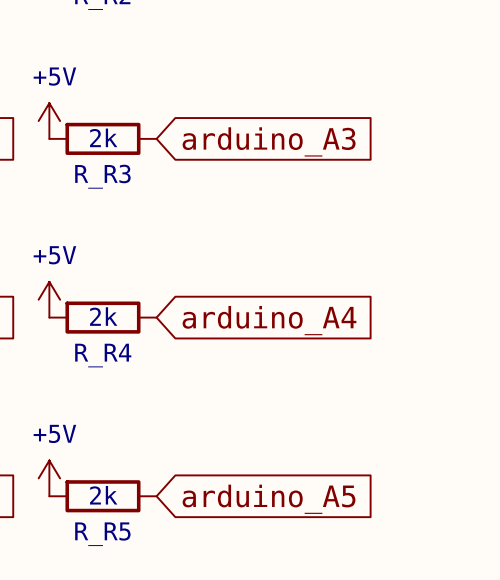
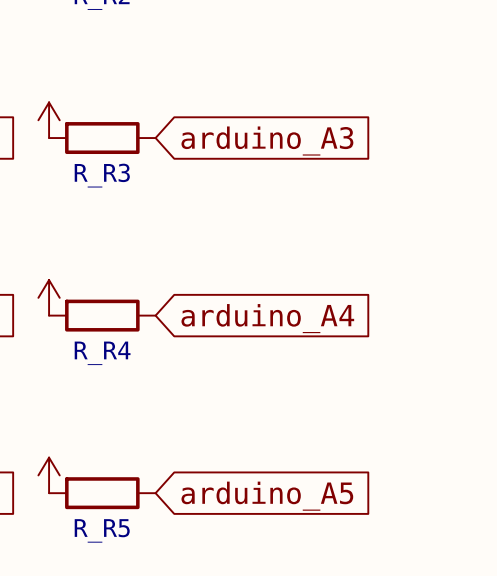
power symbol text: +5V (54, 76) -> none
R_R3 value: 2k (103, 137) -> none
power symbol text: +5V (54, 255) -> none
R_R4 value: 2k (103, 316) -> none
power symbol text: +5V (54, 433) -> none
R_R5 value: 2k (103, 495) -> none

